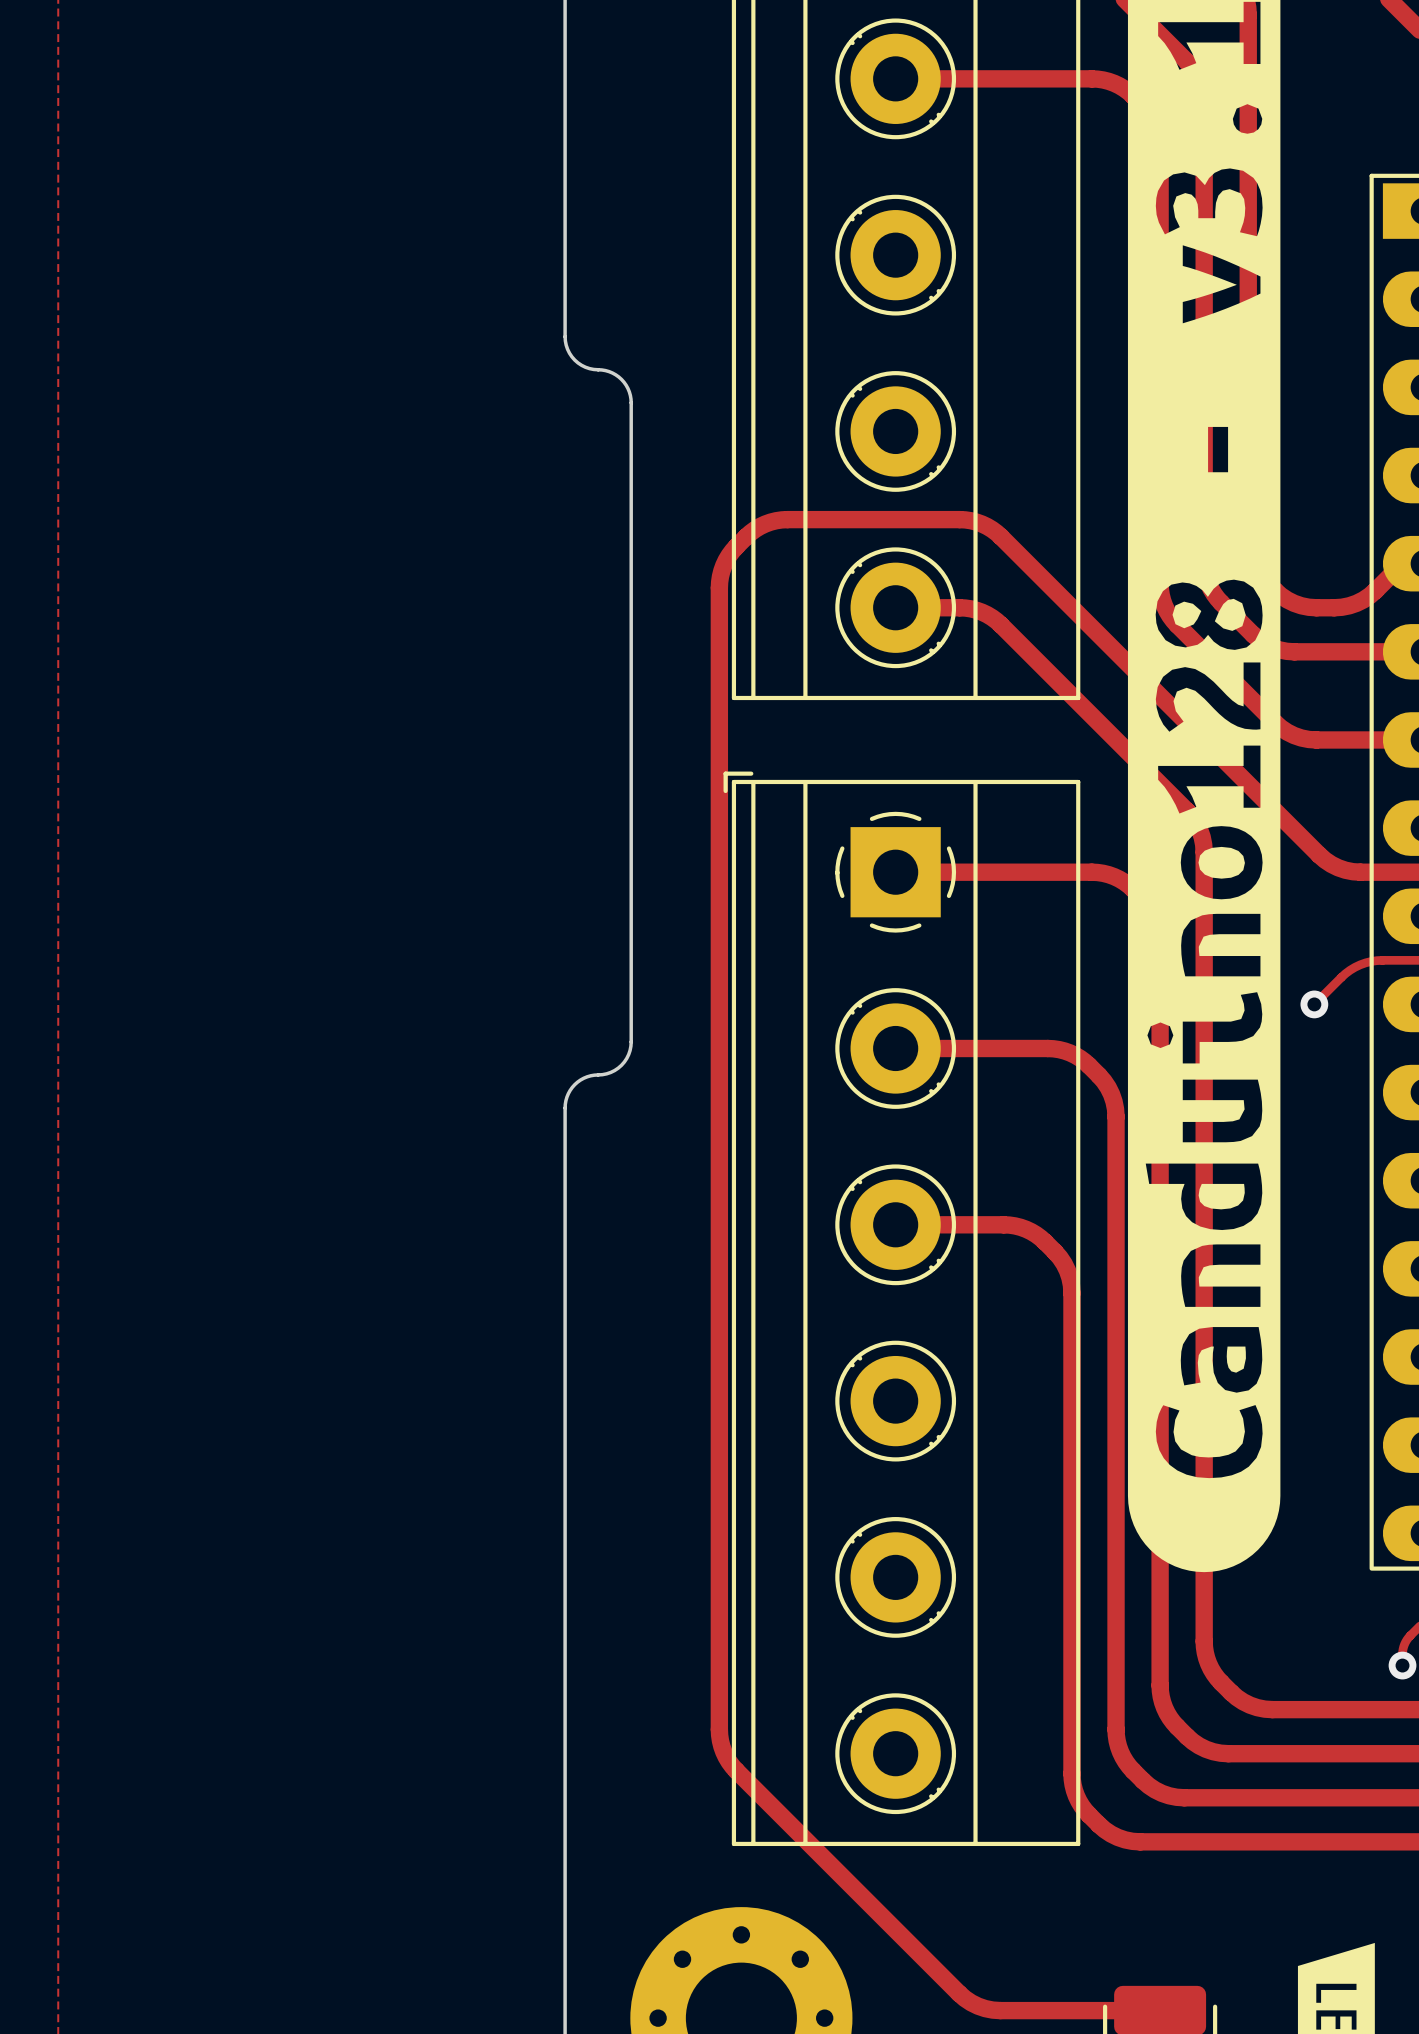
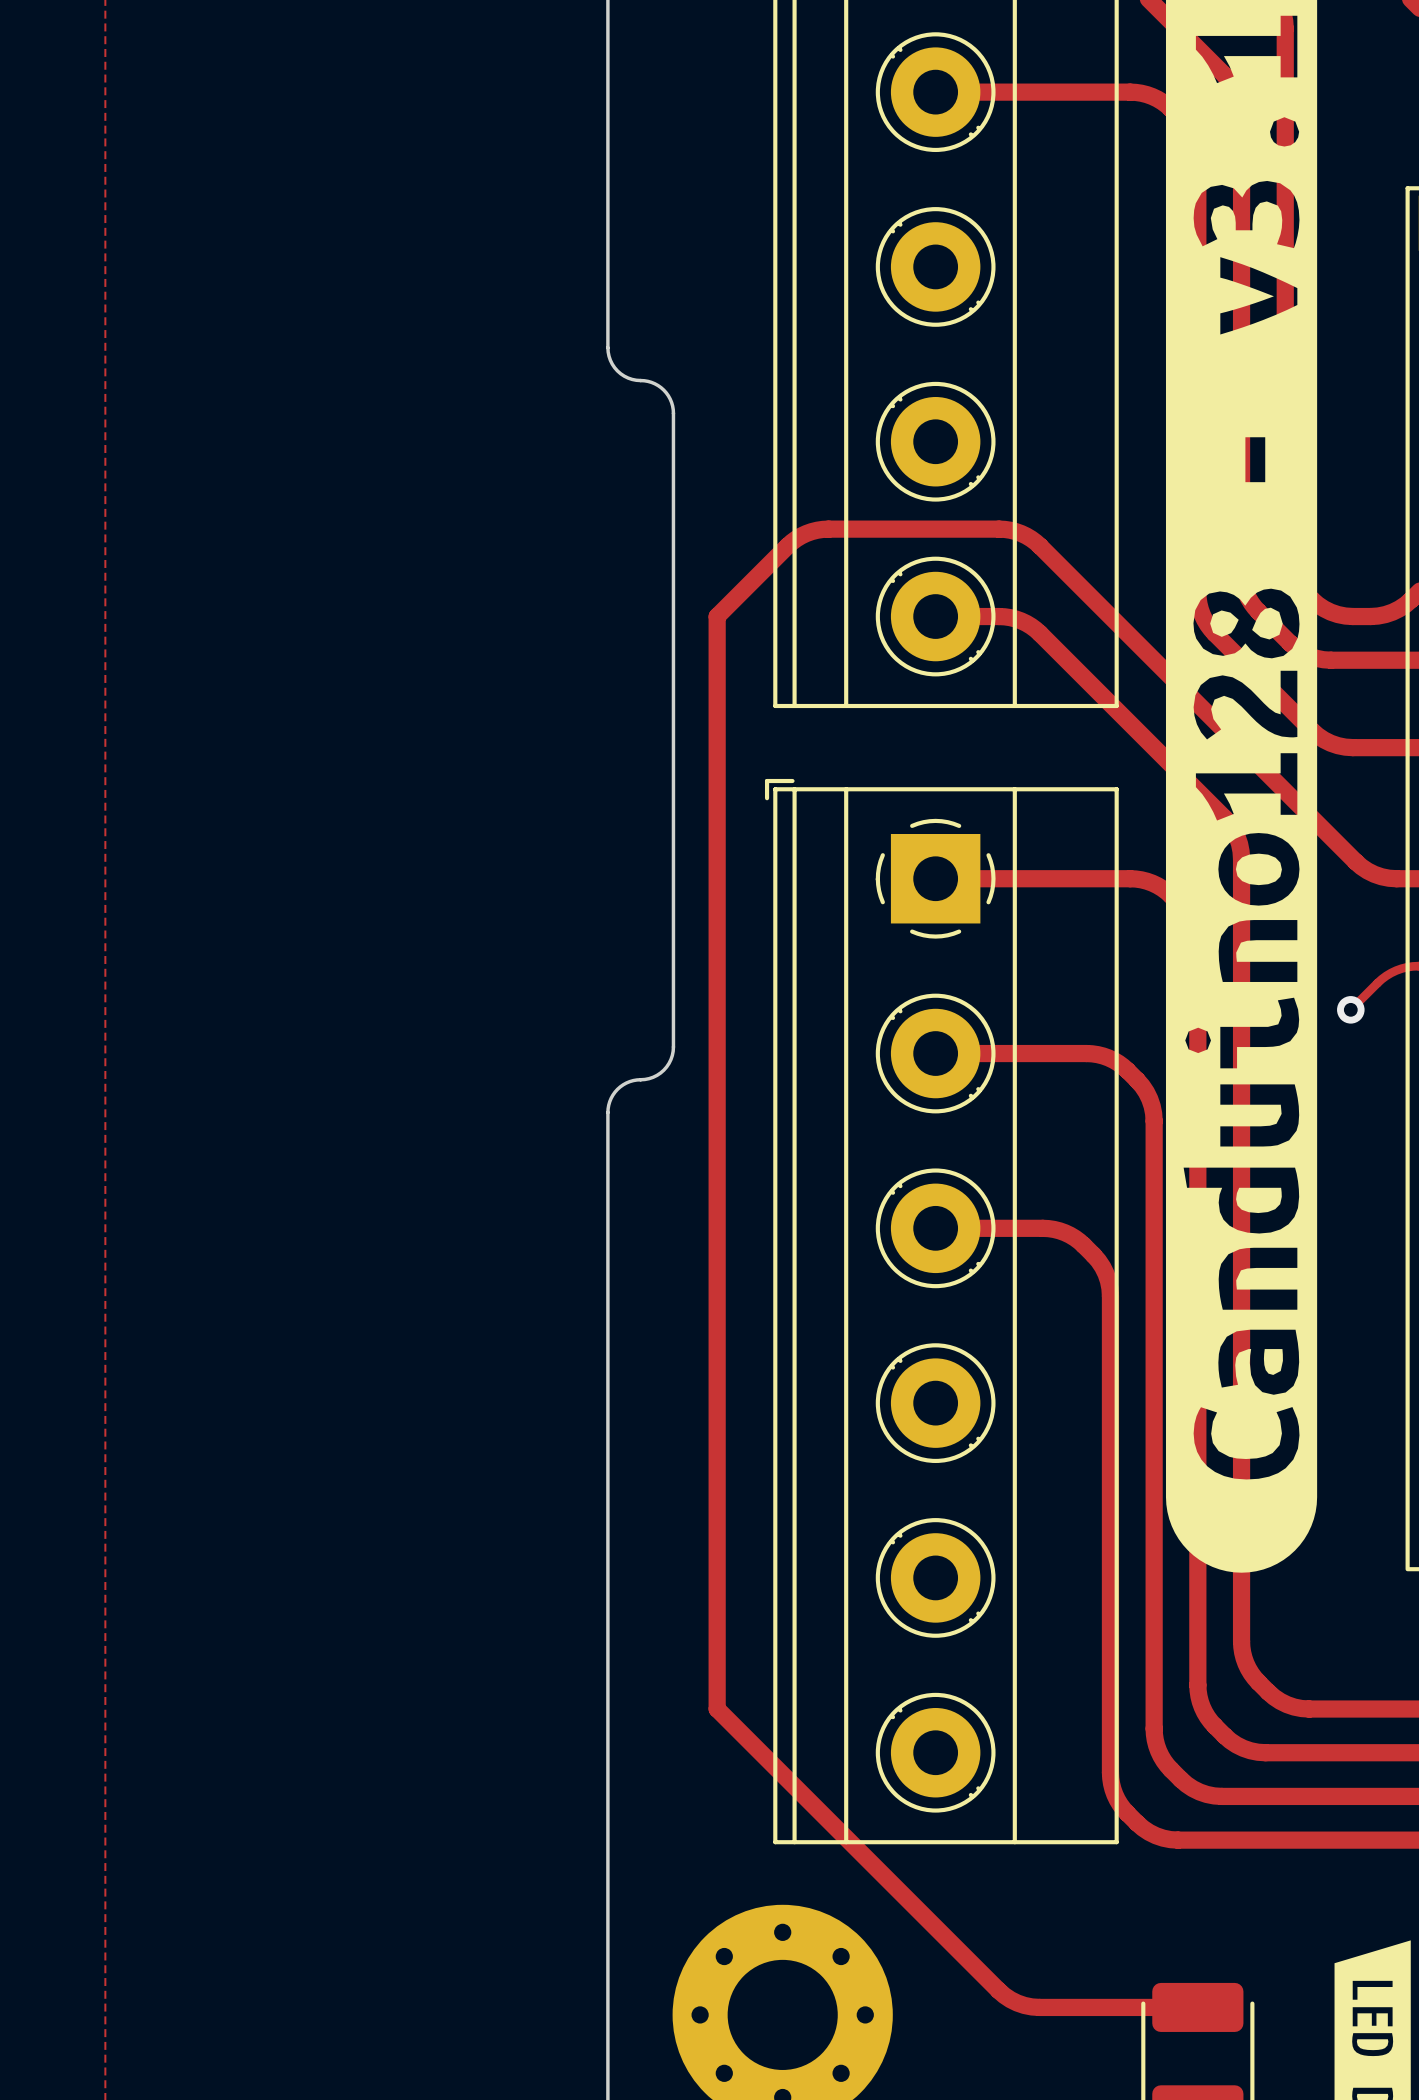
track: (736, 546) (723, 565) (719, 587) (719, 1729) (723, 1751) (736, 1770) -> (777, 555) (717, 616) (717, 1709) (777, 1769)

